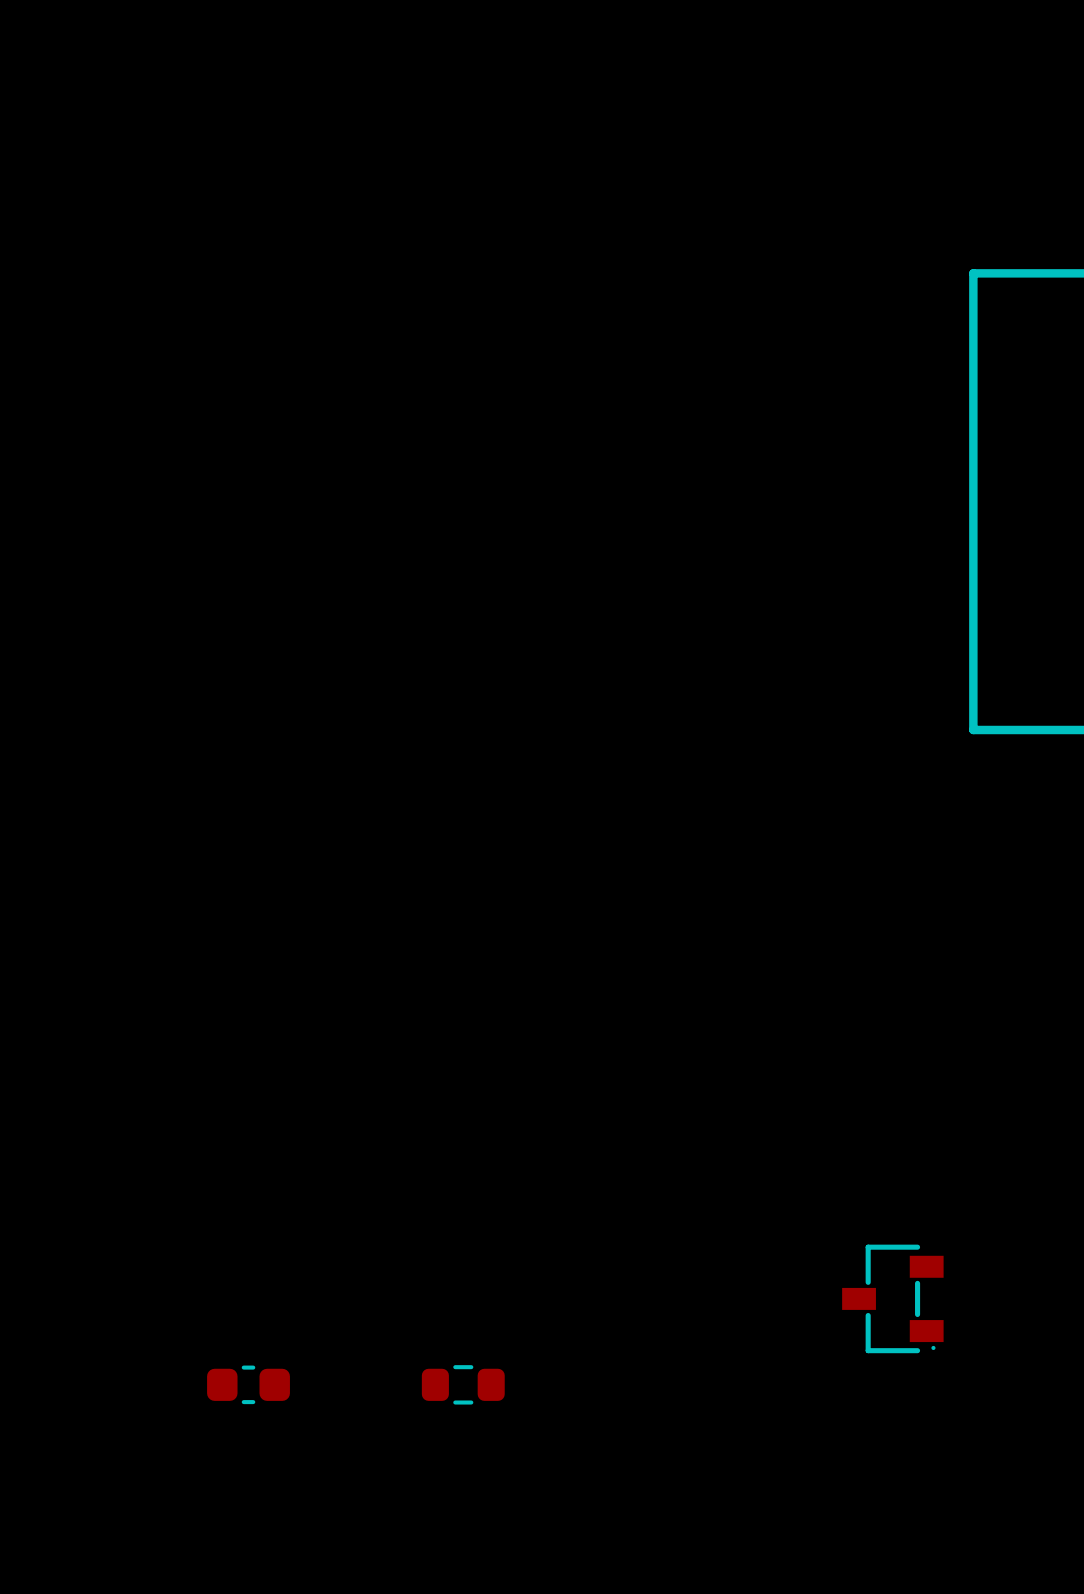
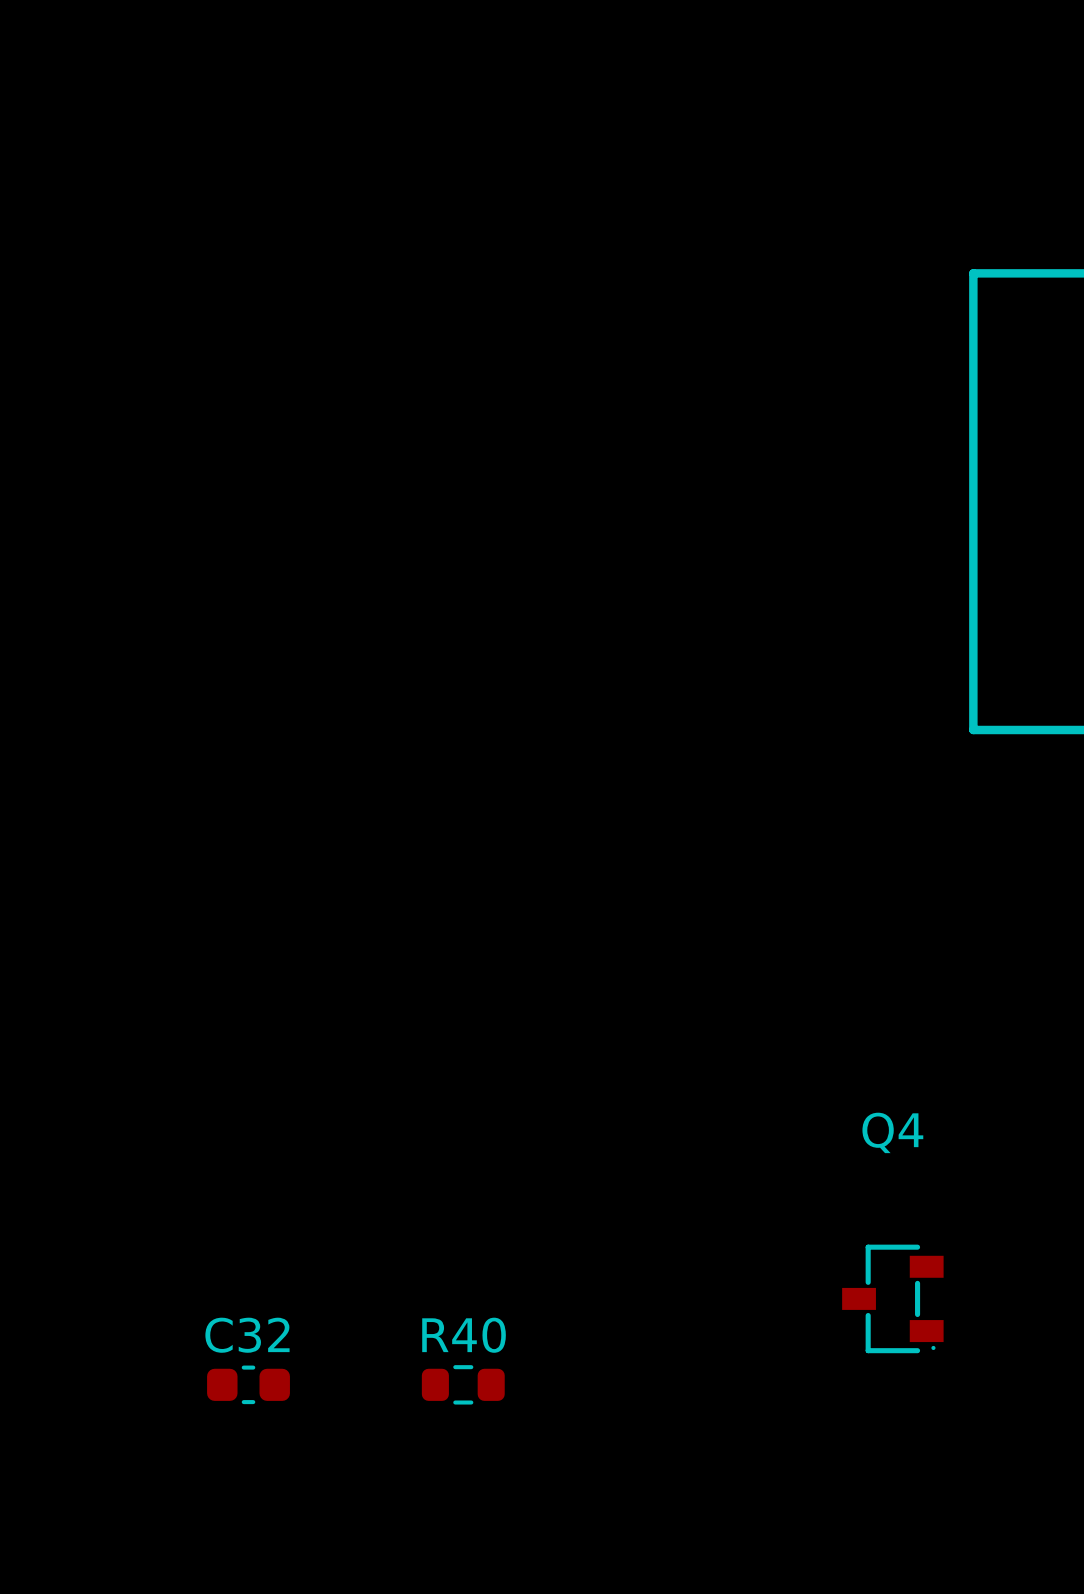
Q4 name: none -> Q4 (892, 1132)
R40 name: none -> R40 (464, 1335)
C32 name: none -> C32 (247, 1335)

